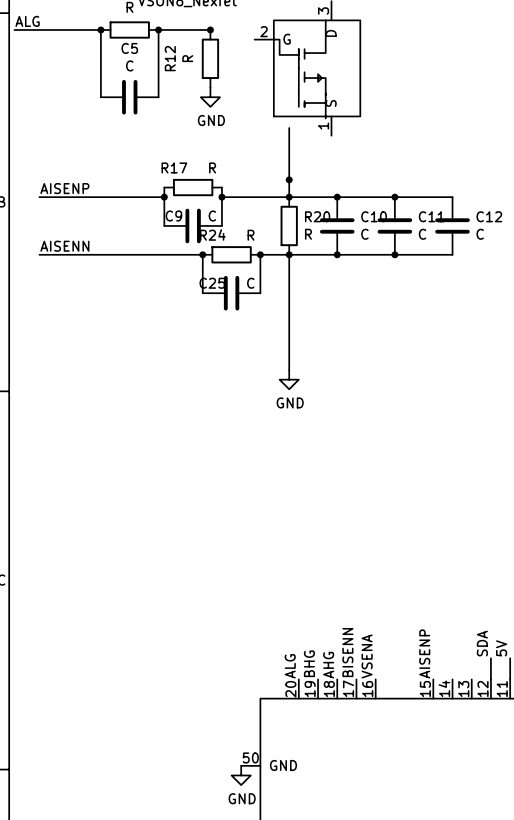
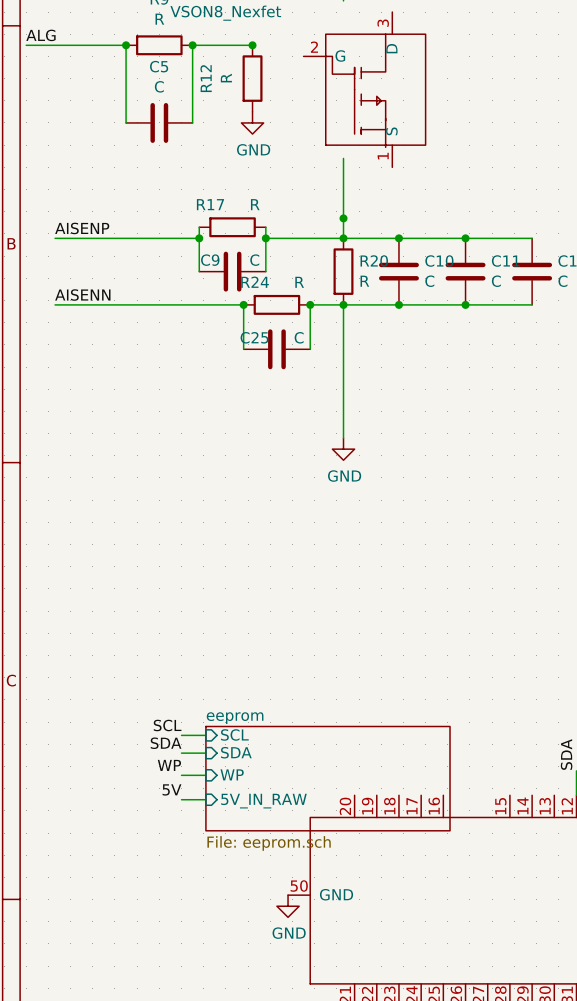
label: none -> SCL (167, 725)
wire: none -> (181, 735) (205, 735)
sheet pin: none -> SCL (234, 734)
label: none -> SDA (166, 743)
wire: none -> (181, 753) (205, 753)
sheet pin: none -> SDA (236, 752)
label: BISENN (347, 652) -> none
label: none -> WP (169, 765)
label: AISENP (424, 653) -> none
label: VSENA (367, 656) -> none
sheet pin: none -> WP (232, 774)
wire: none -> (181, 775) (205, 775)
label: BHG (309, 663) -> none
sheet eeprom: none -> File: eeprom.sch (327, 778)
label: AHG (328, 665) -> none
label: ALG (290, 666) -> none
label: none -> 5V (172, 789)
wire: none -> (181, 799) (205, 799)
sheet pin: none -> 5V_IN_RAW (263, 801)

